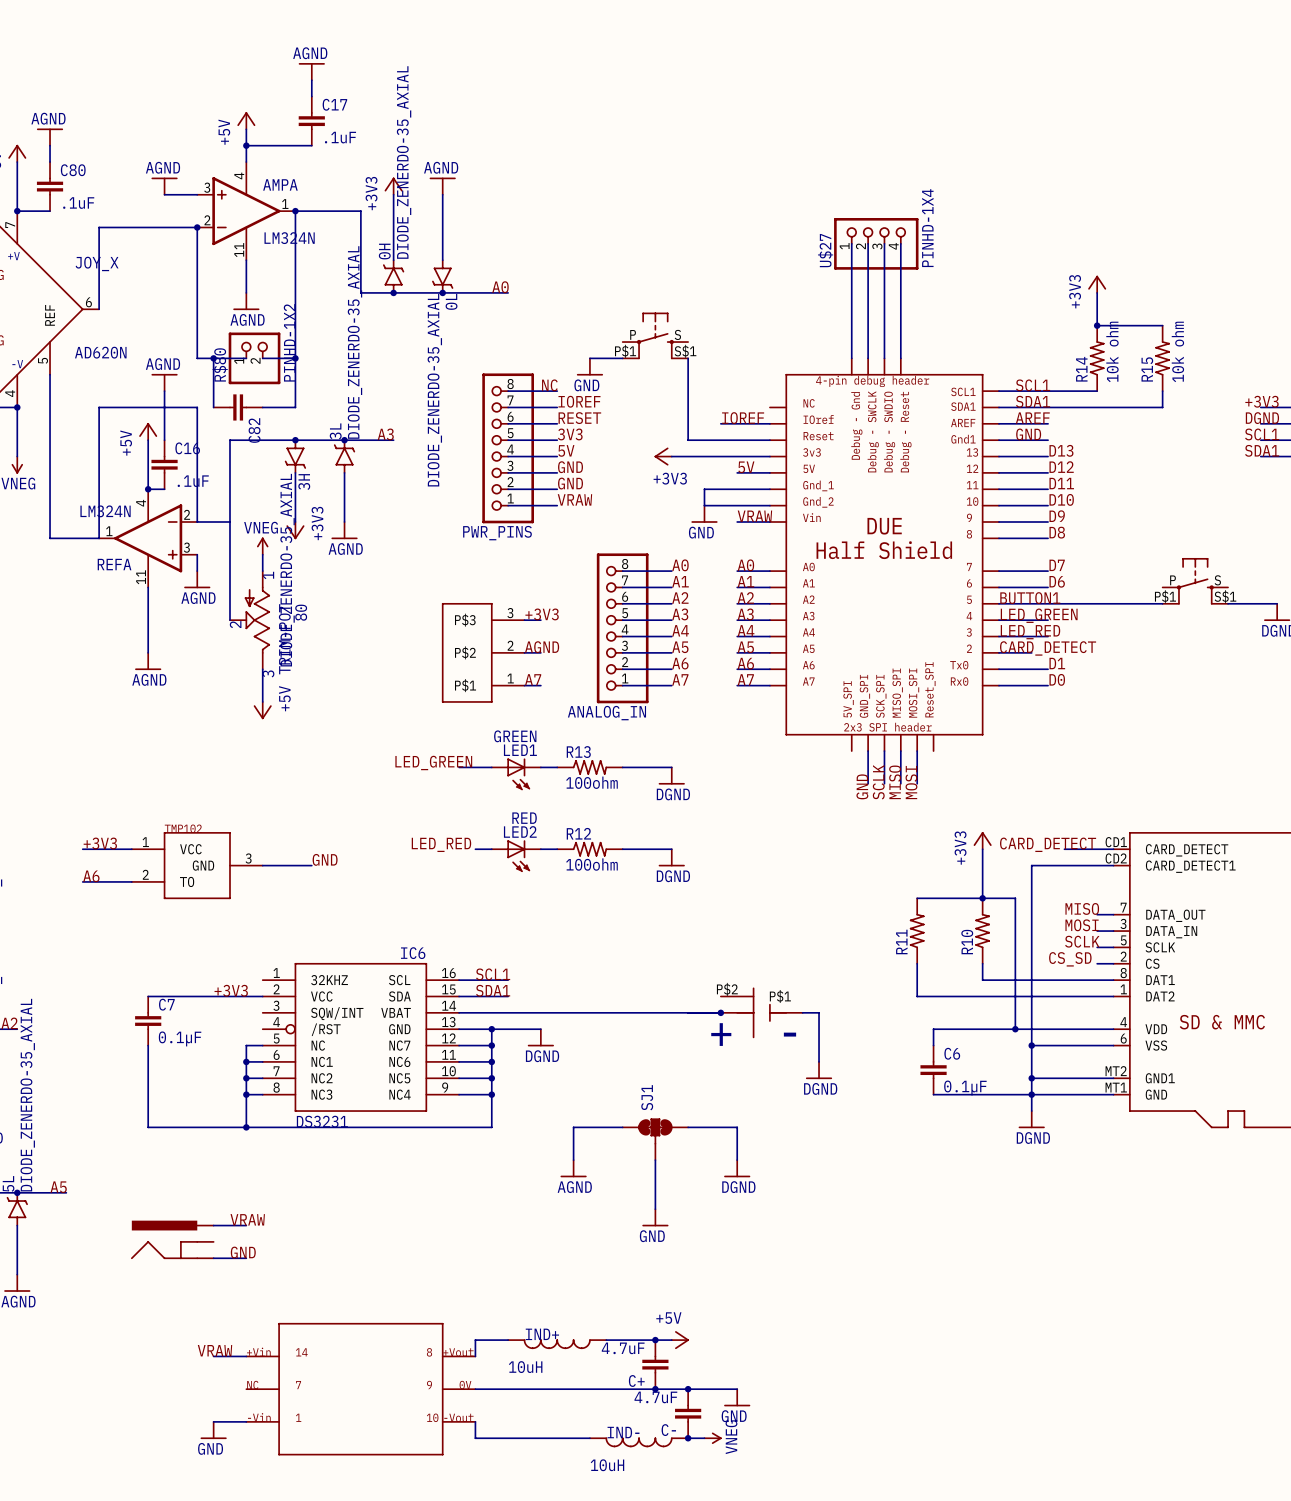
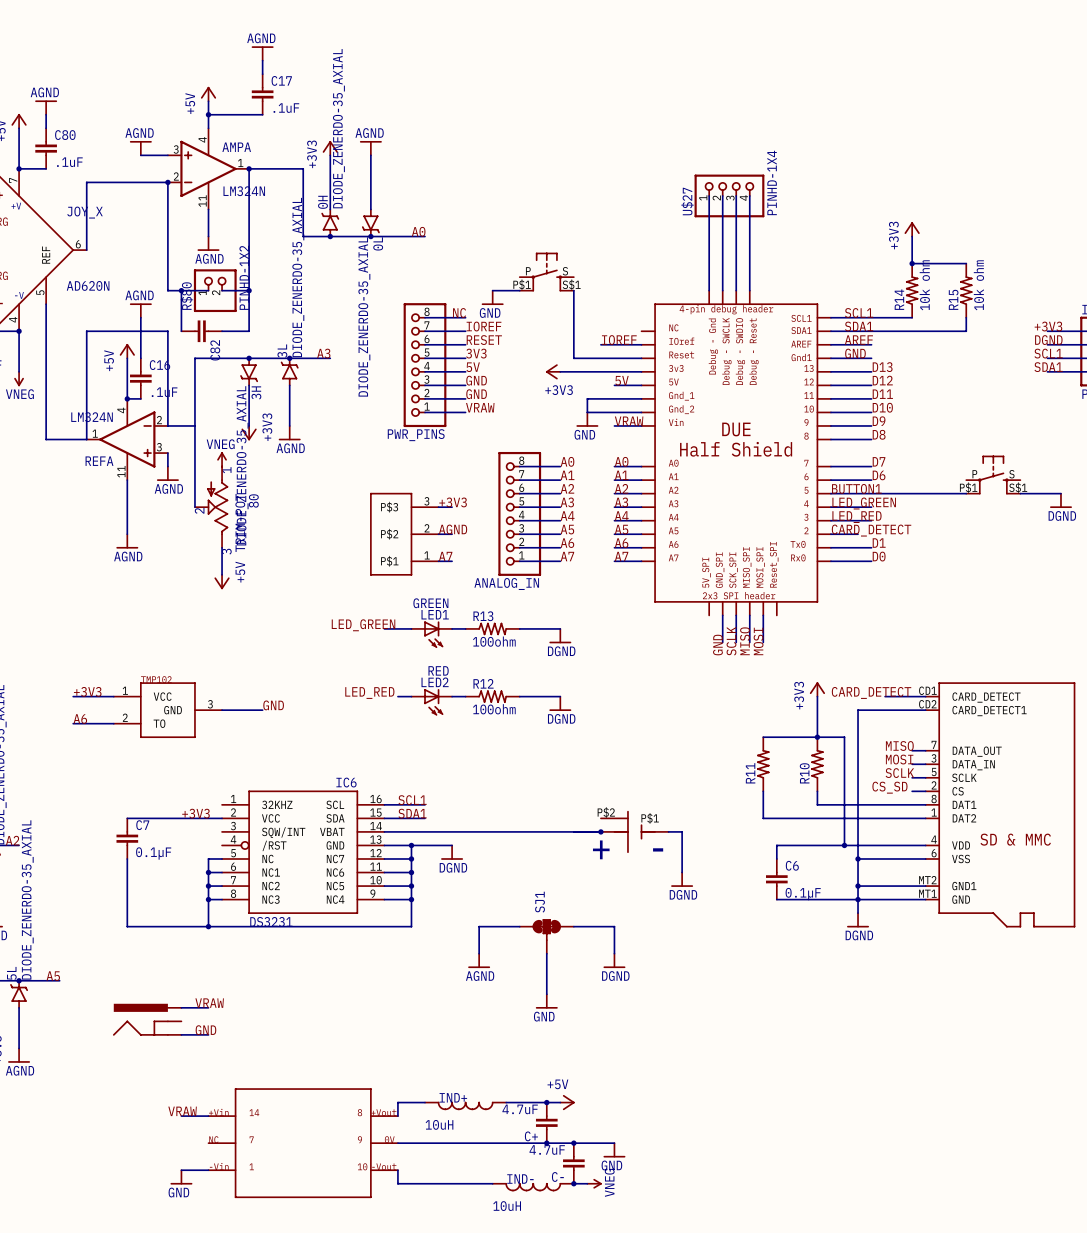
power symbol position: VNEG (262, 546) -> VNEG (222, 459)

